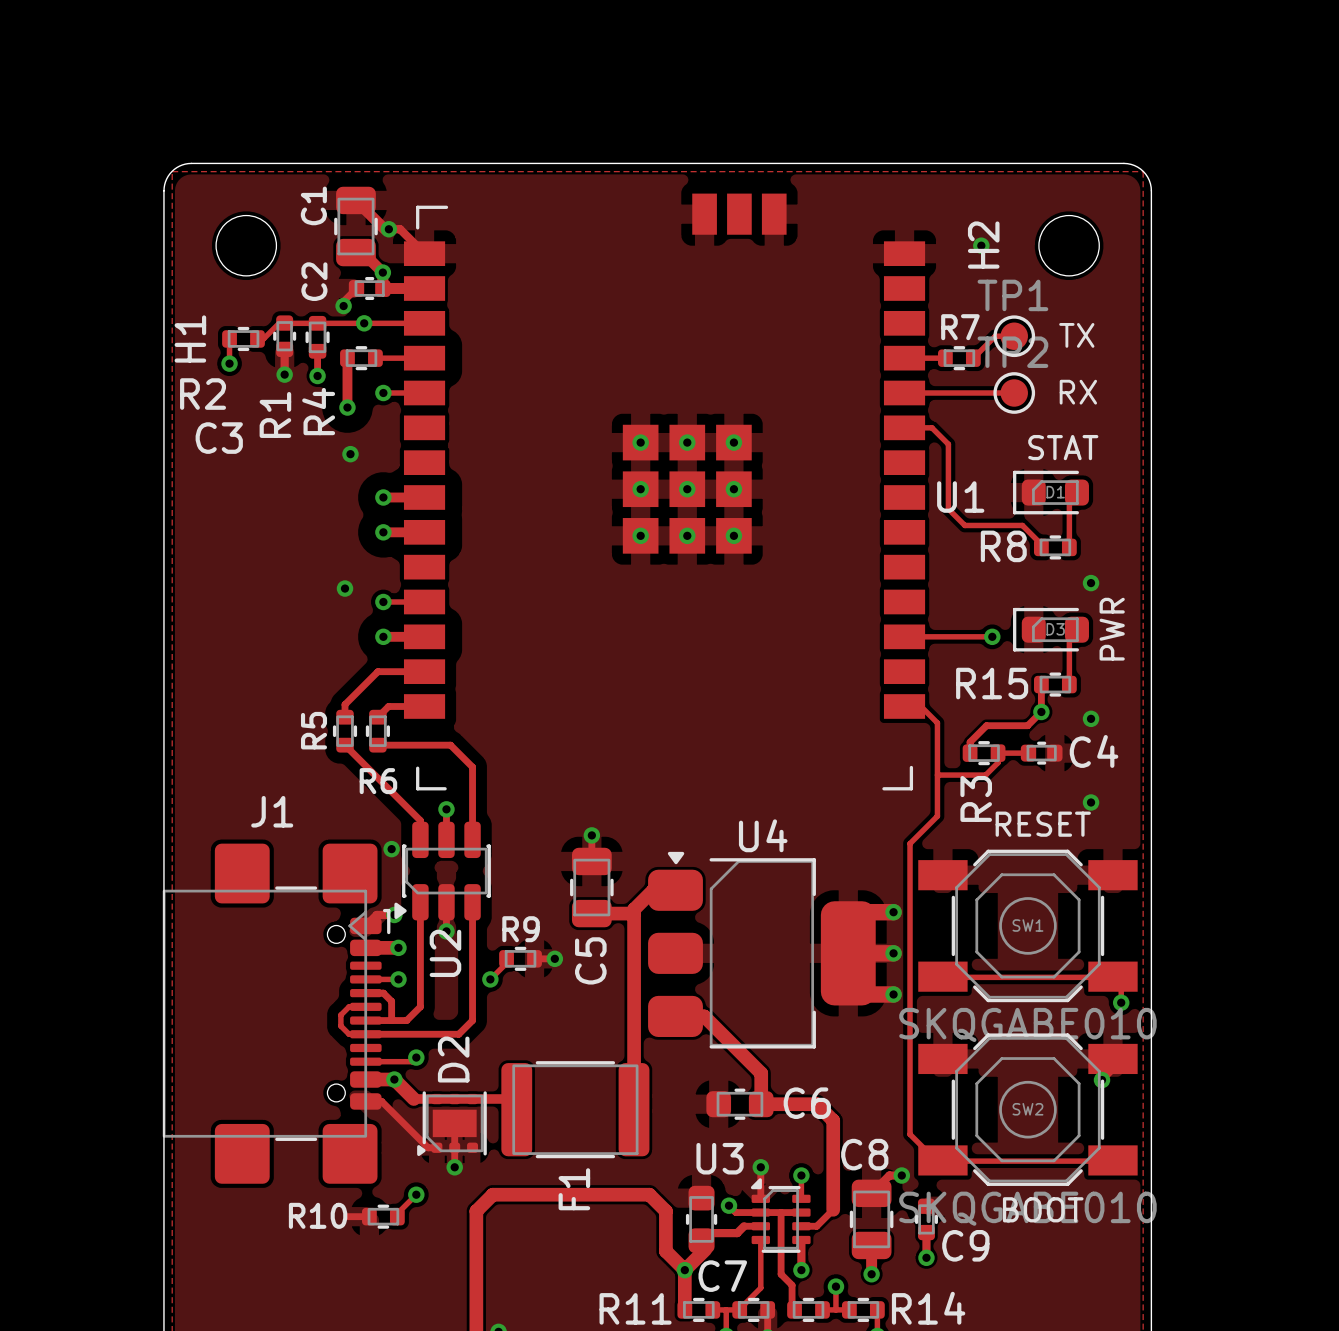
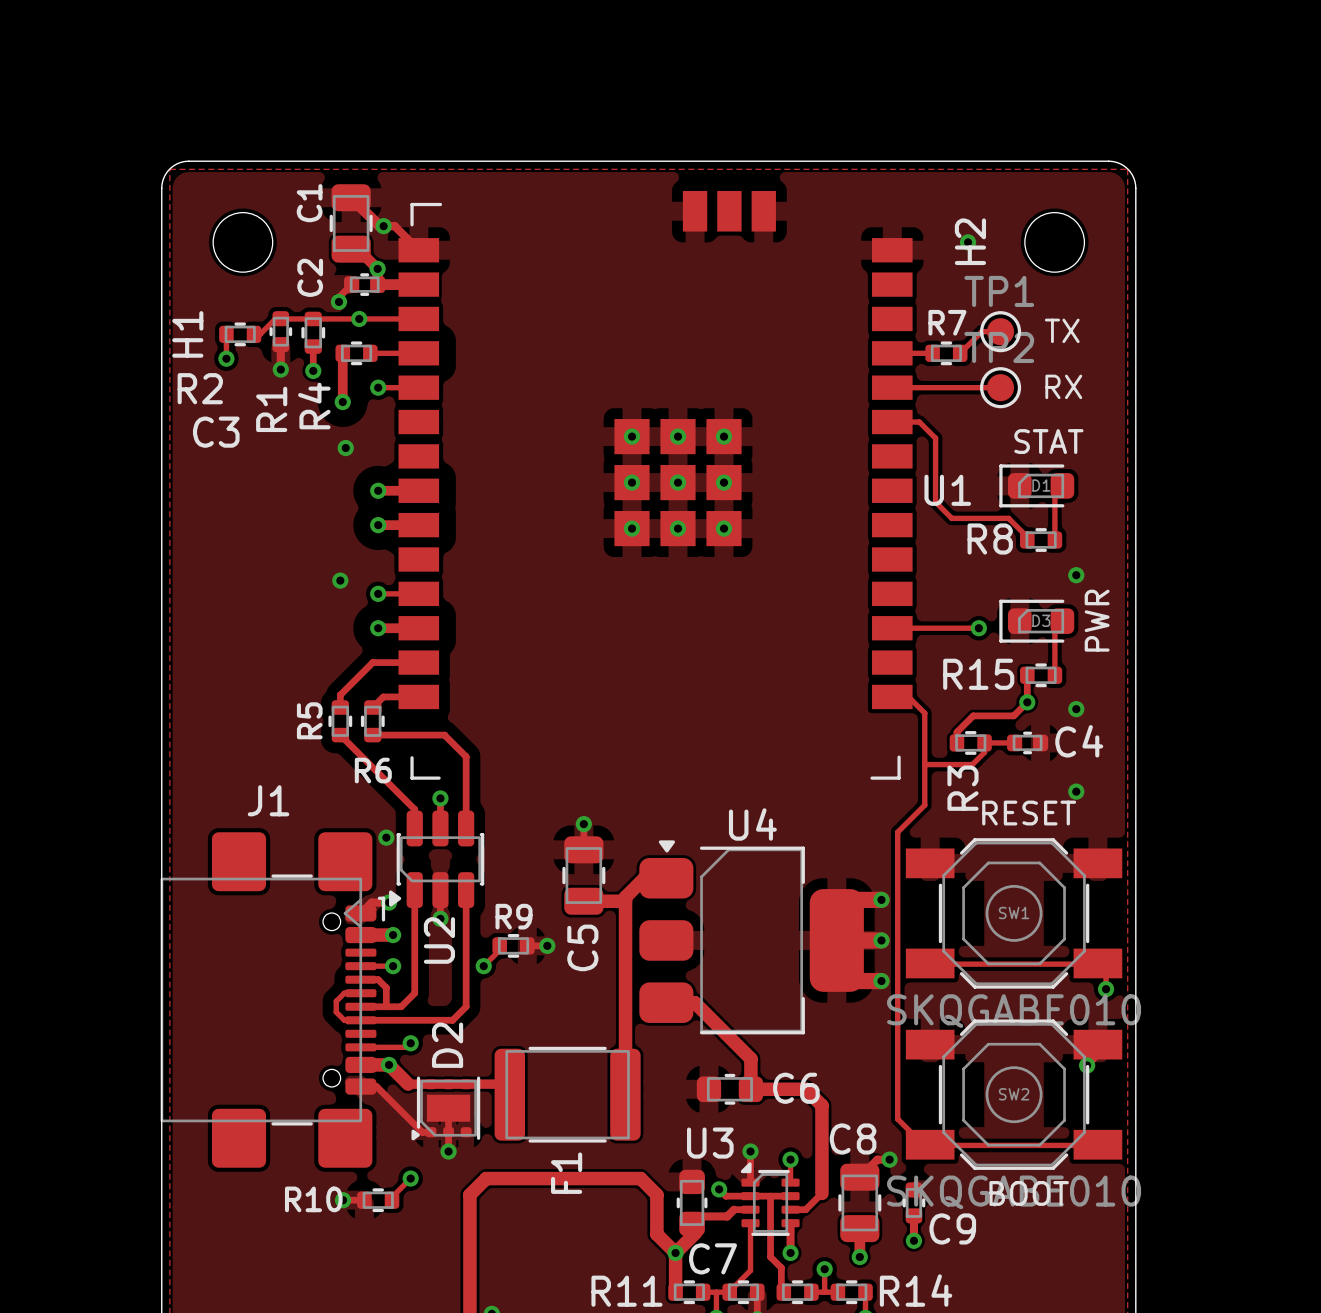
via: none -> (343, 1200)

